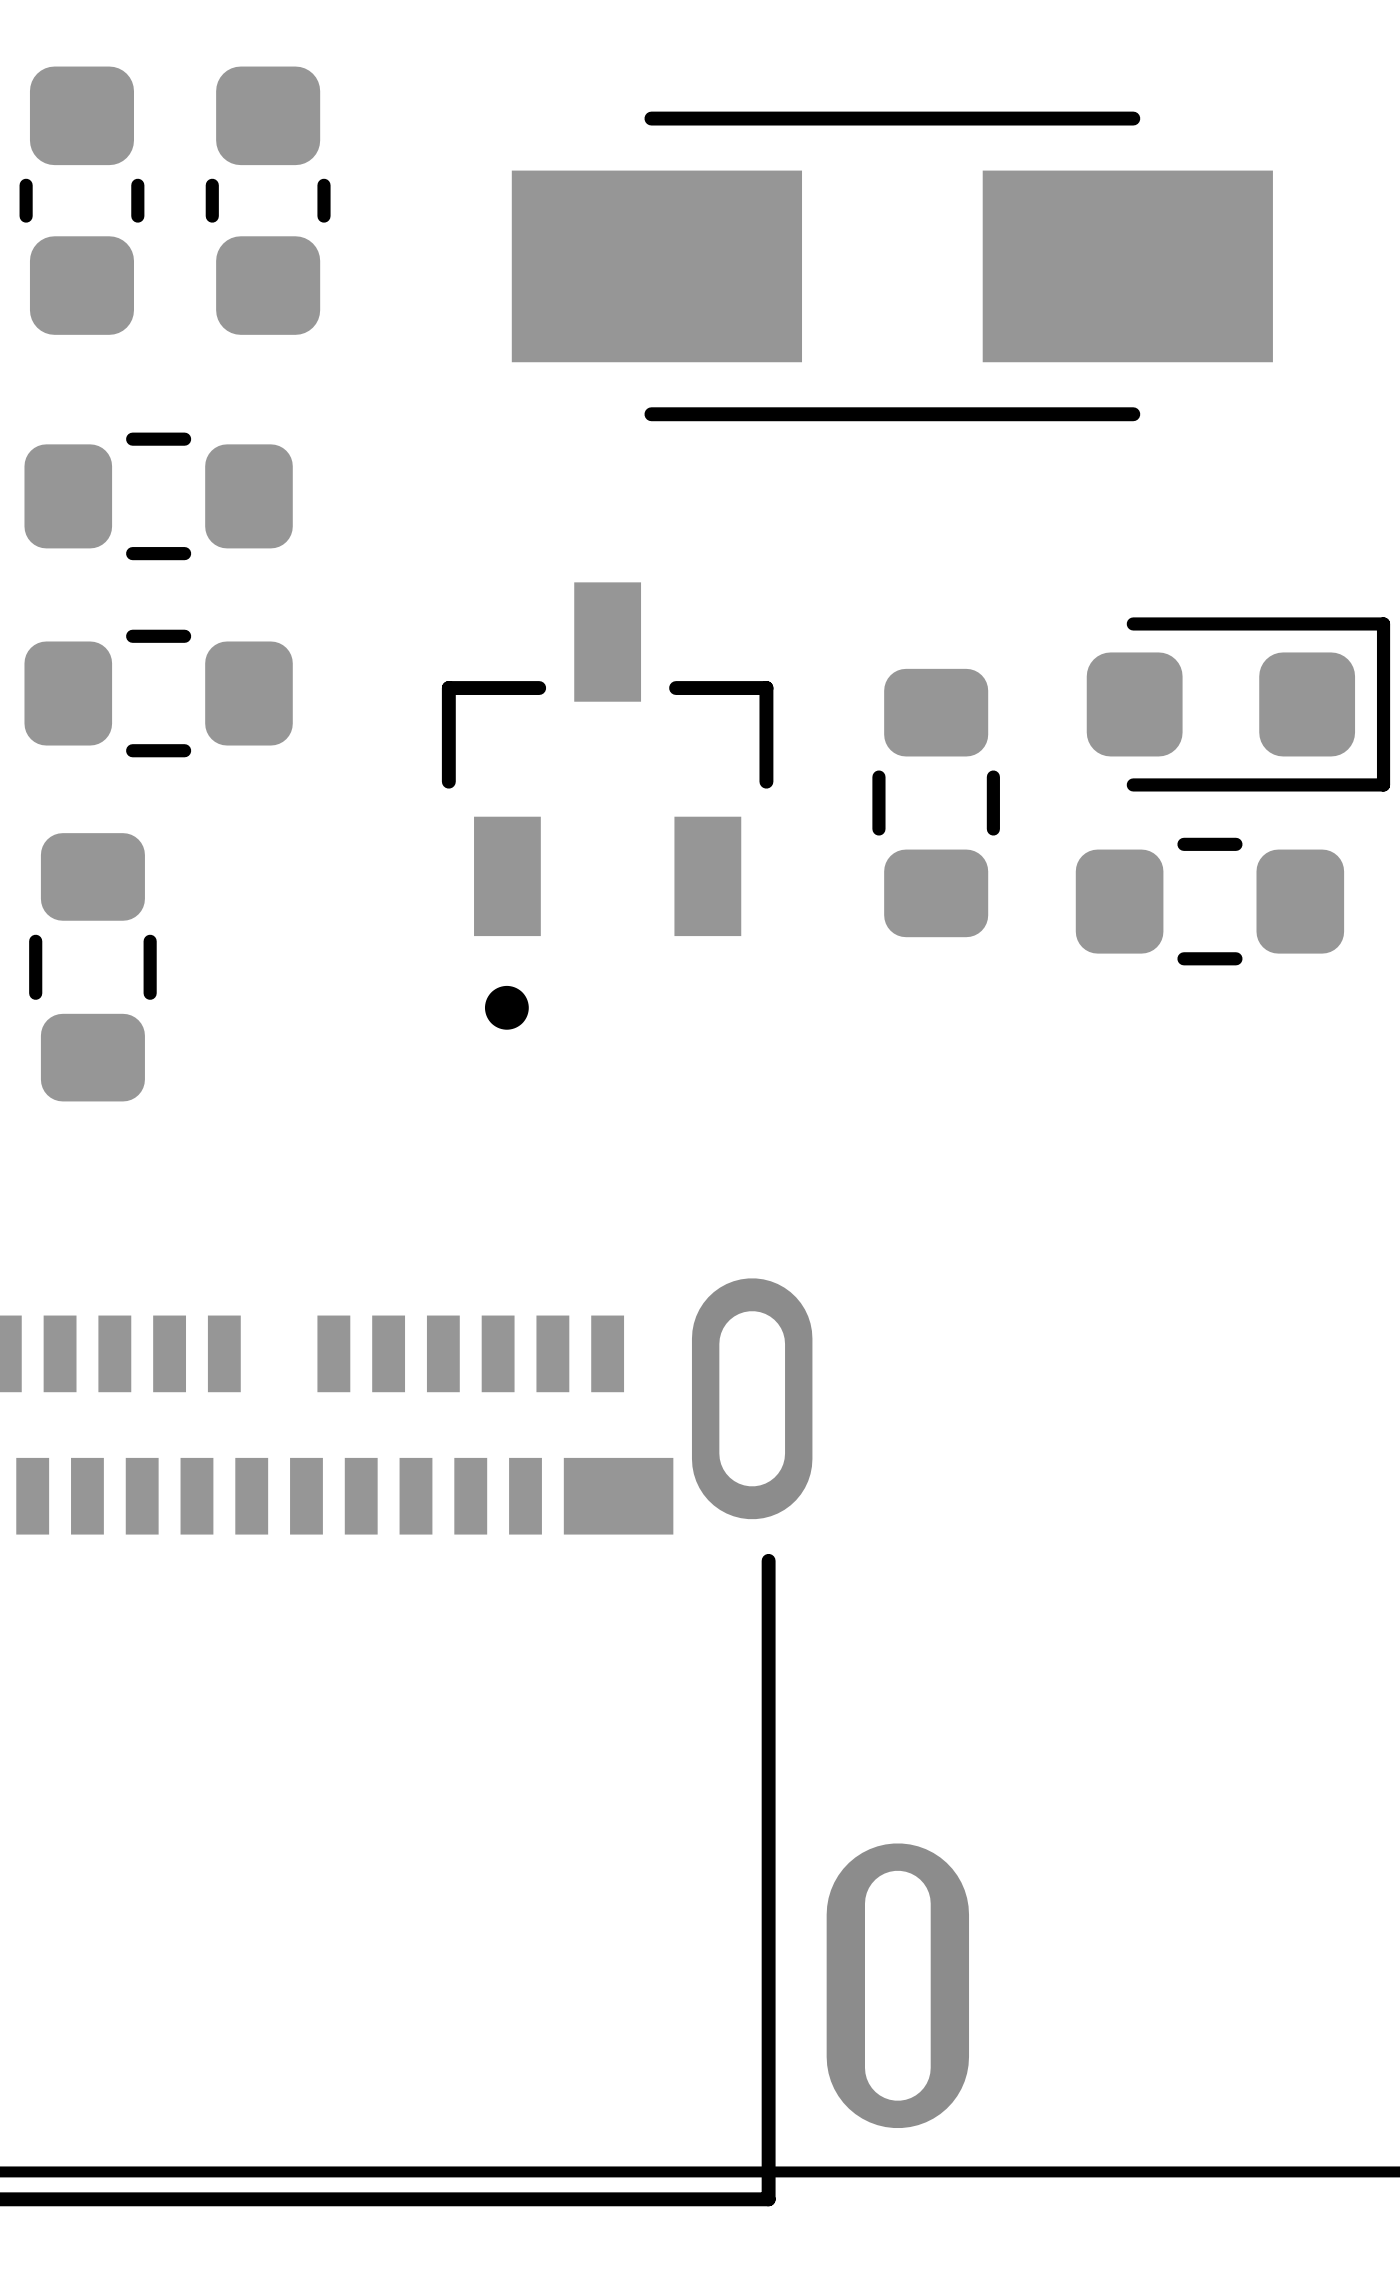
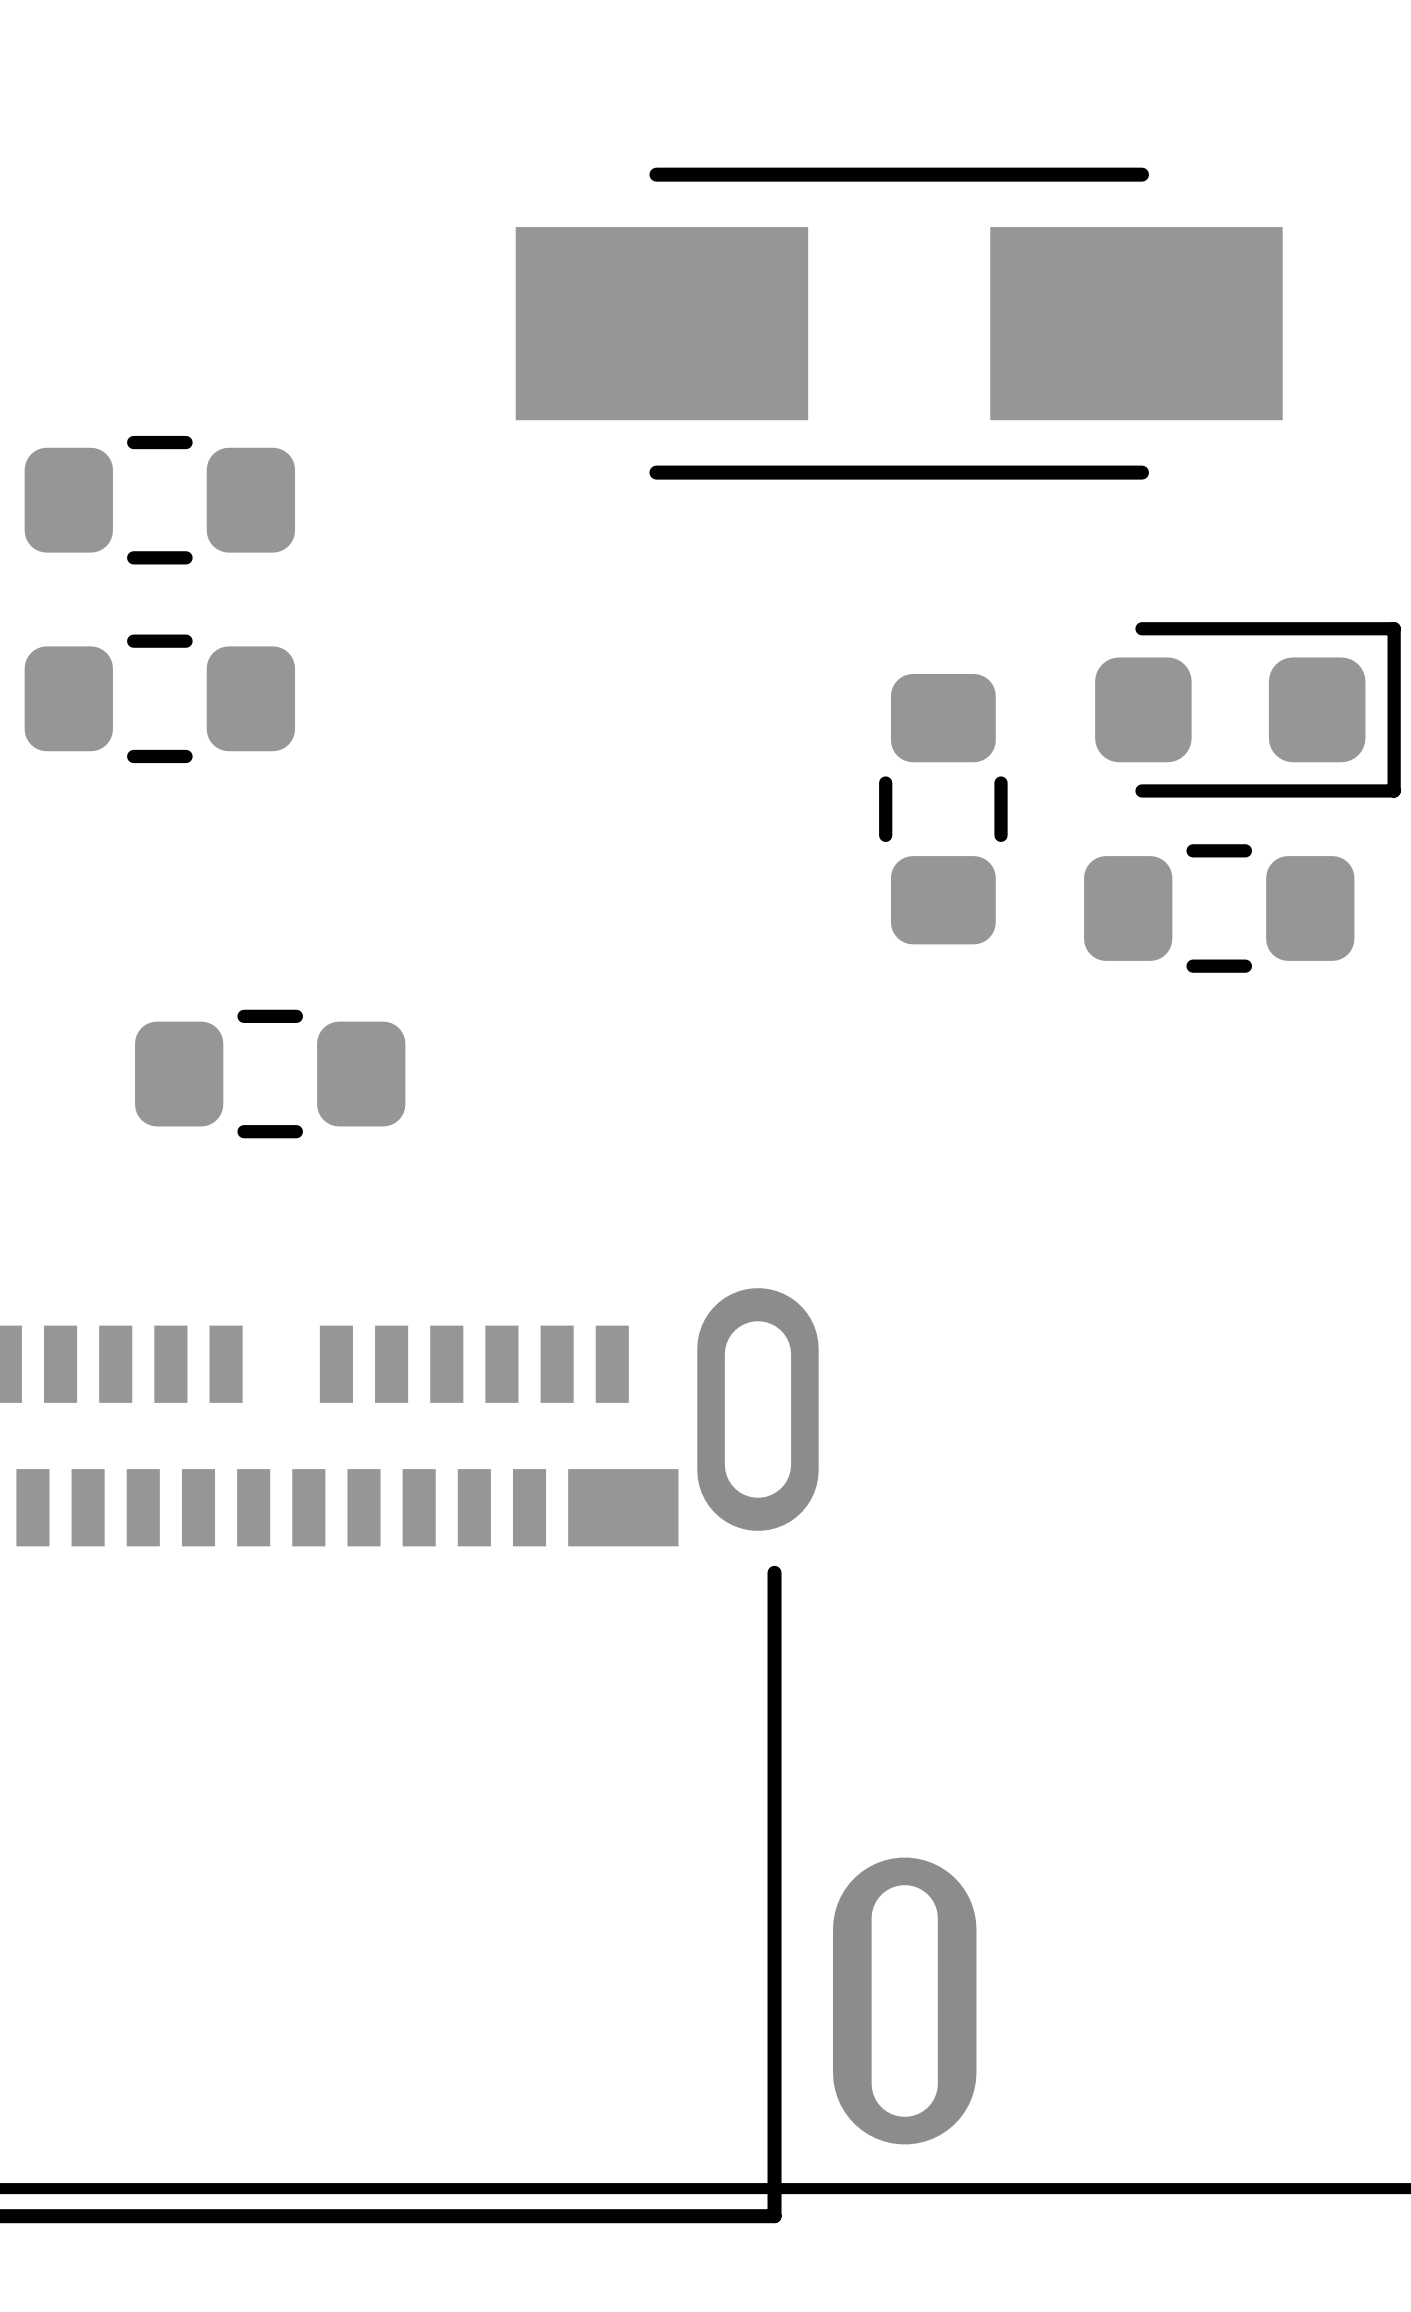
part: (81, 200) -> none
part: (268, 200) -> none
part position: (892, 266) -> (899, 323)
part: (607, 806) -> none
part rotation: 0° (92, 967) -> 90° clockwise (270, 1074)
part position: (92, 967) -> (270, 1074)

